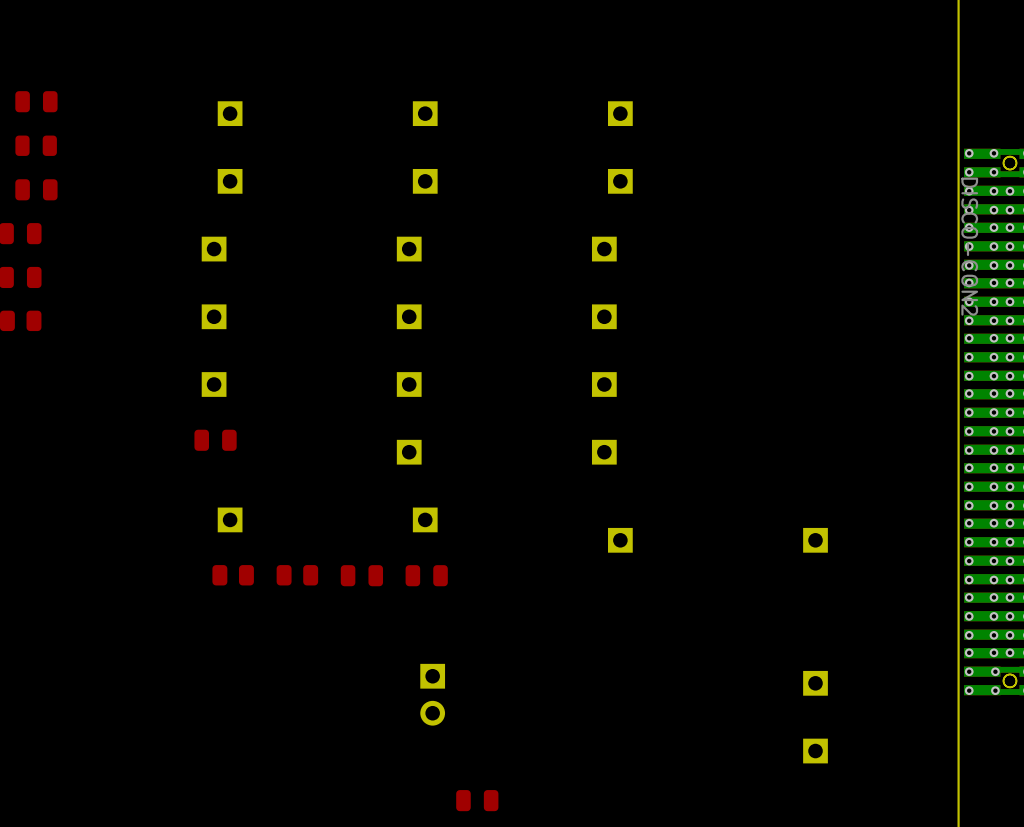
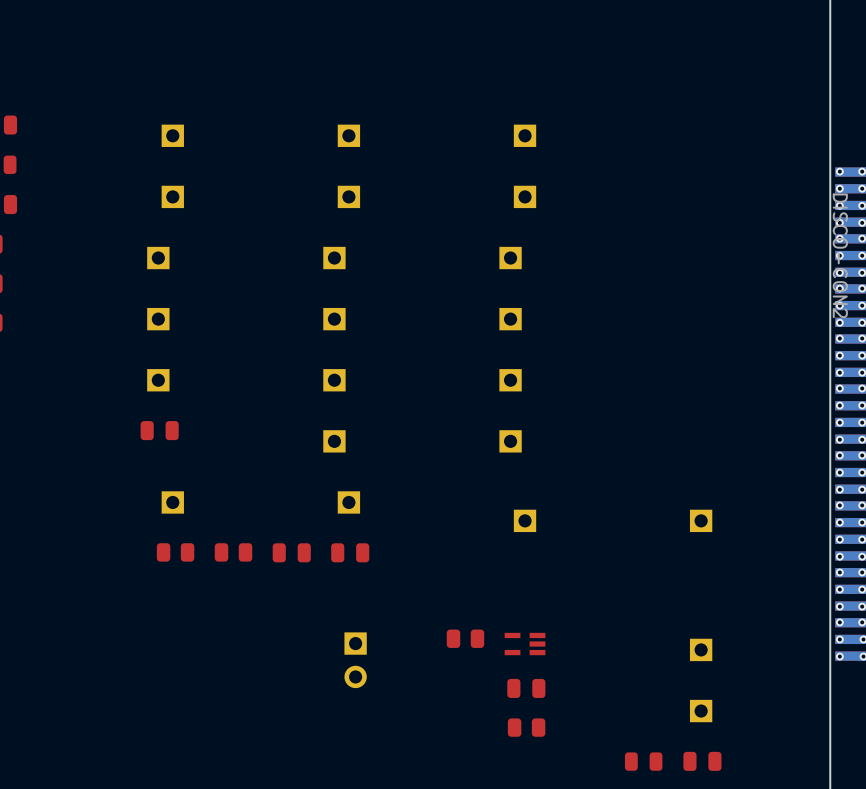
part: none -> (465, 638)
part: none -> (525, 644)
part: none -> (526, 727)
part position: (477, 800) -> (526, 688)
part: none -> (702, 761)
part: none -> (643, 761)

